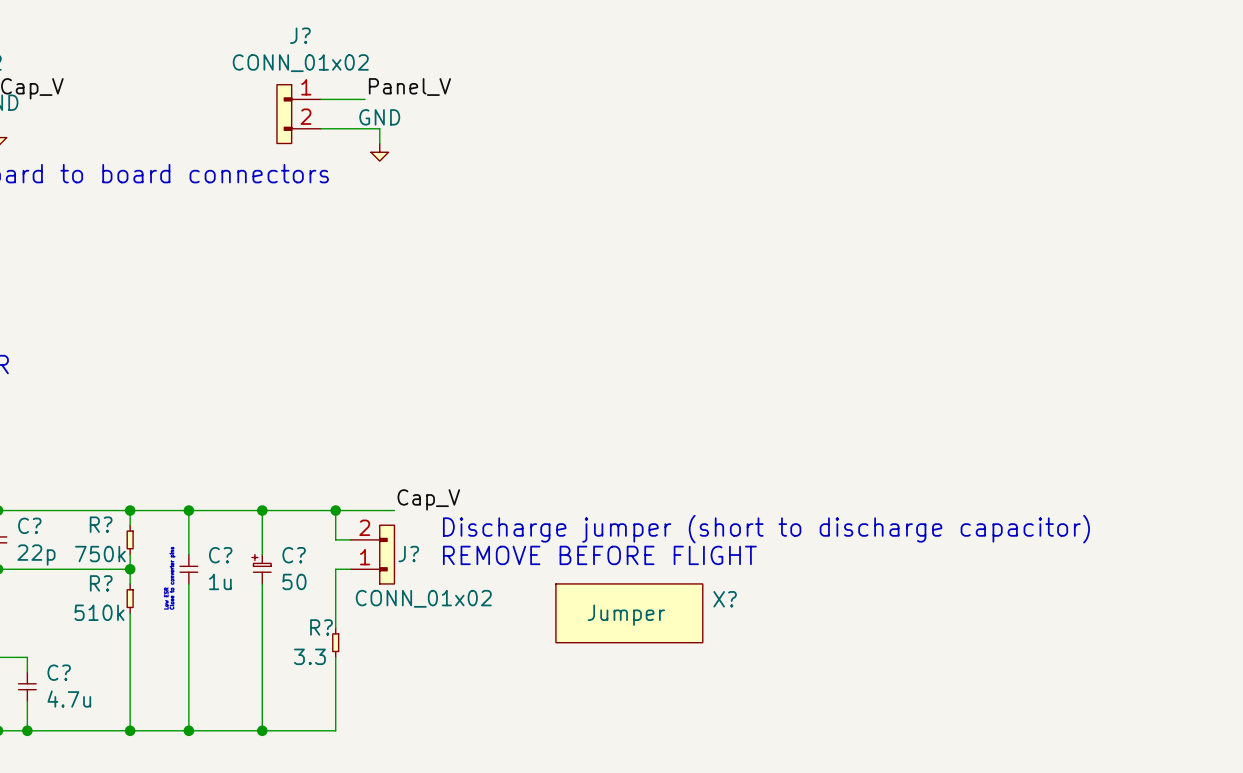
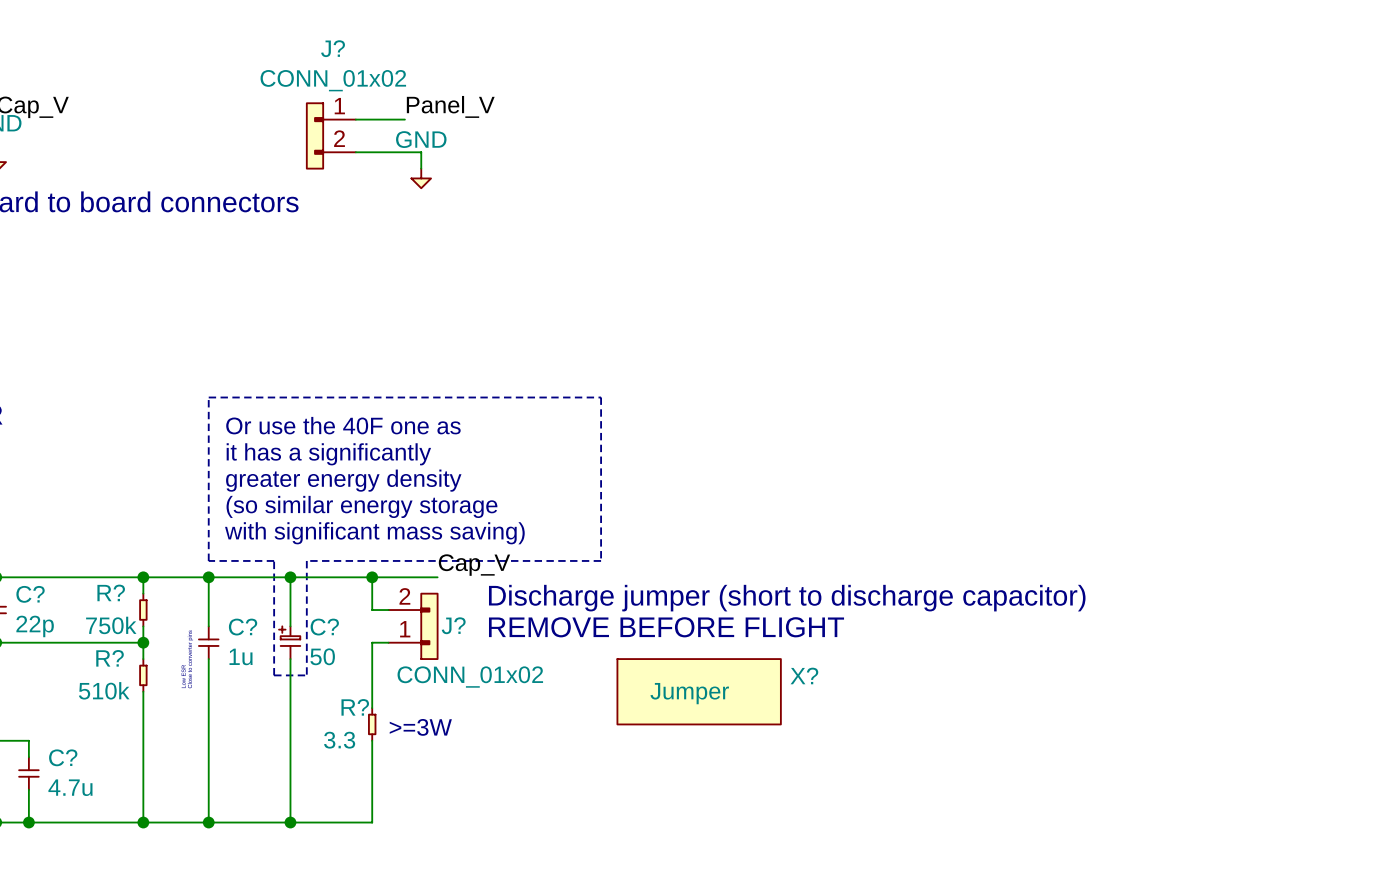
line: none -> (208, 397) (208, 560) (274, 560) (274, 675) (306, 675) (306, 560) (601, 560) (601, 397) (208, 397)
text: none -> Or use the 40F one as (343, 425)
text: none -> it has a significantly (328, 454)
text: none -> greater energy density (343, 480)
text: none -> (so similar energy storage (361, 506)
text: none -> with significant mass saving) (374, 533)
text: none -> >=3W (420, 727)

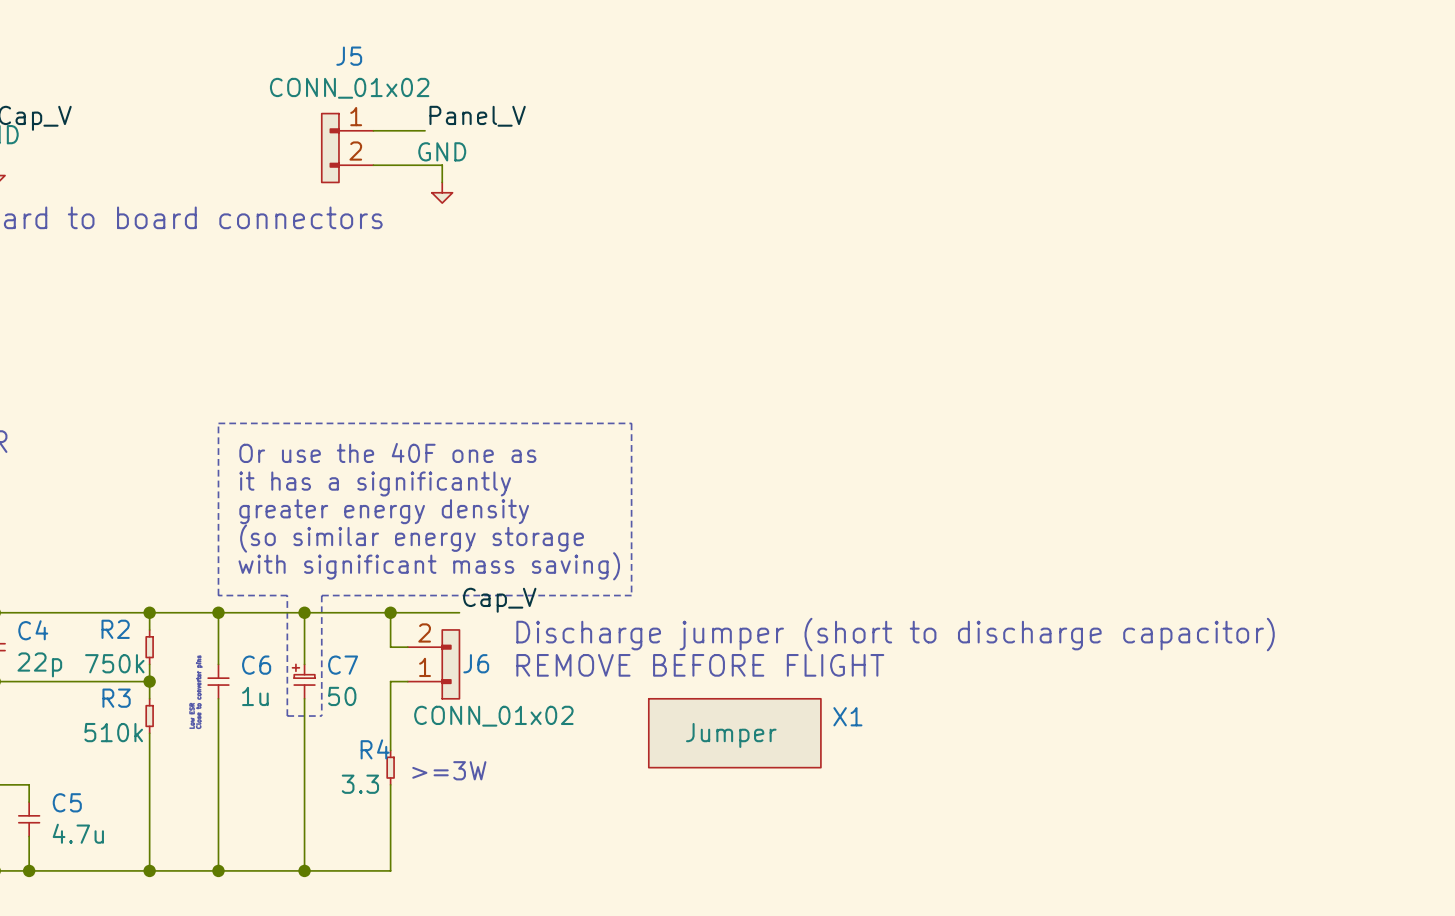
J? name: J? (333, 48) -> J5 (349, 56)
R? name: R? (111, 592) -> R2 (115, 629)
C? name: C? (30, 594) -> C4 (33, 630)
J? name: J? (453, 625) -> J6 (476, 663)
C? name: C? (243, 627) -> C6 (256, 665)
C? name: C? (324, 627) -> C7 (343, 665)
R? name: R? (110, 658) -> R3 (116, 698)
X? name: X? (804, 675) -> X1 (847, 716)
R? name: R? (355, 707) -> R4 (375, 749)
C? name: C? (63, 757) -> C5 (67, 802)

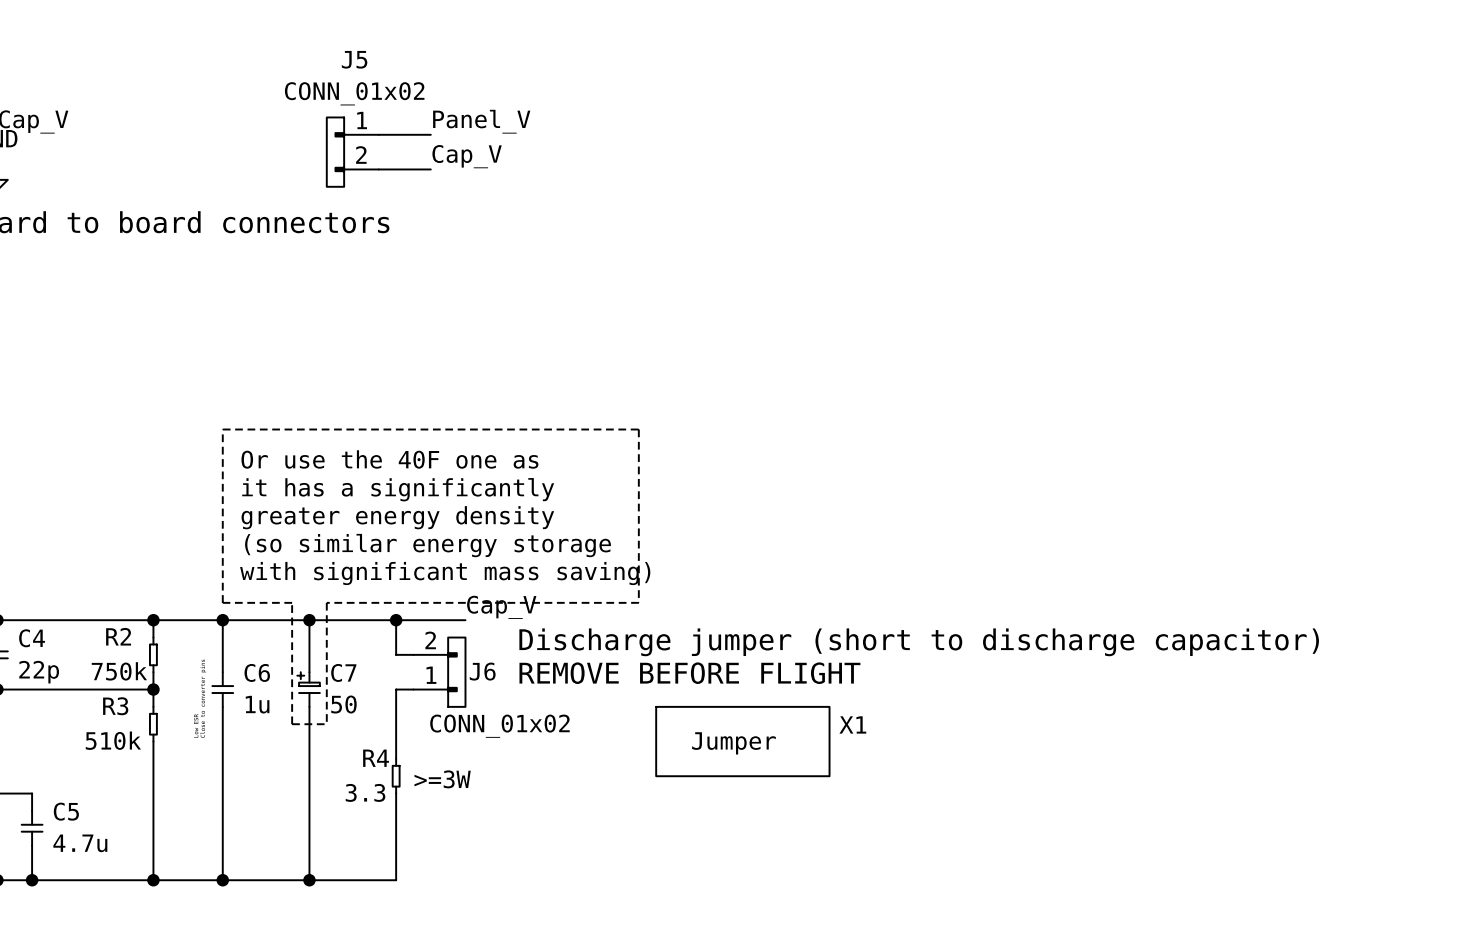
label: none -> Cap_V (467, 156)
wire: (425, 165) (442, 165) (442, 182) -> none
power symbol: GND (442, 192) -> none

